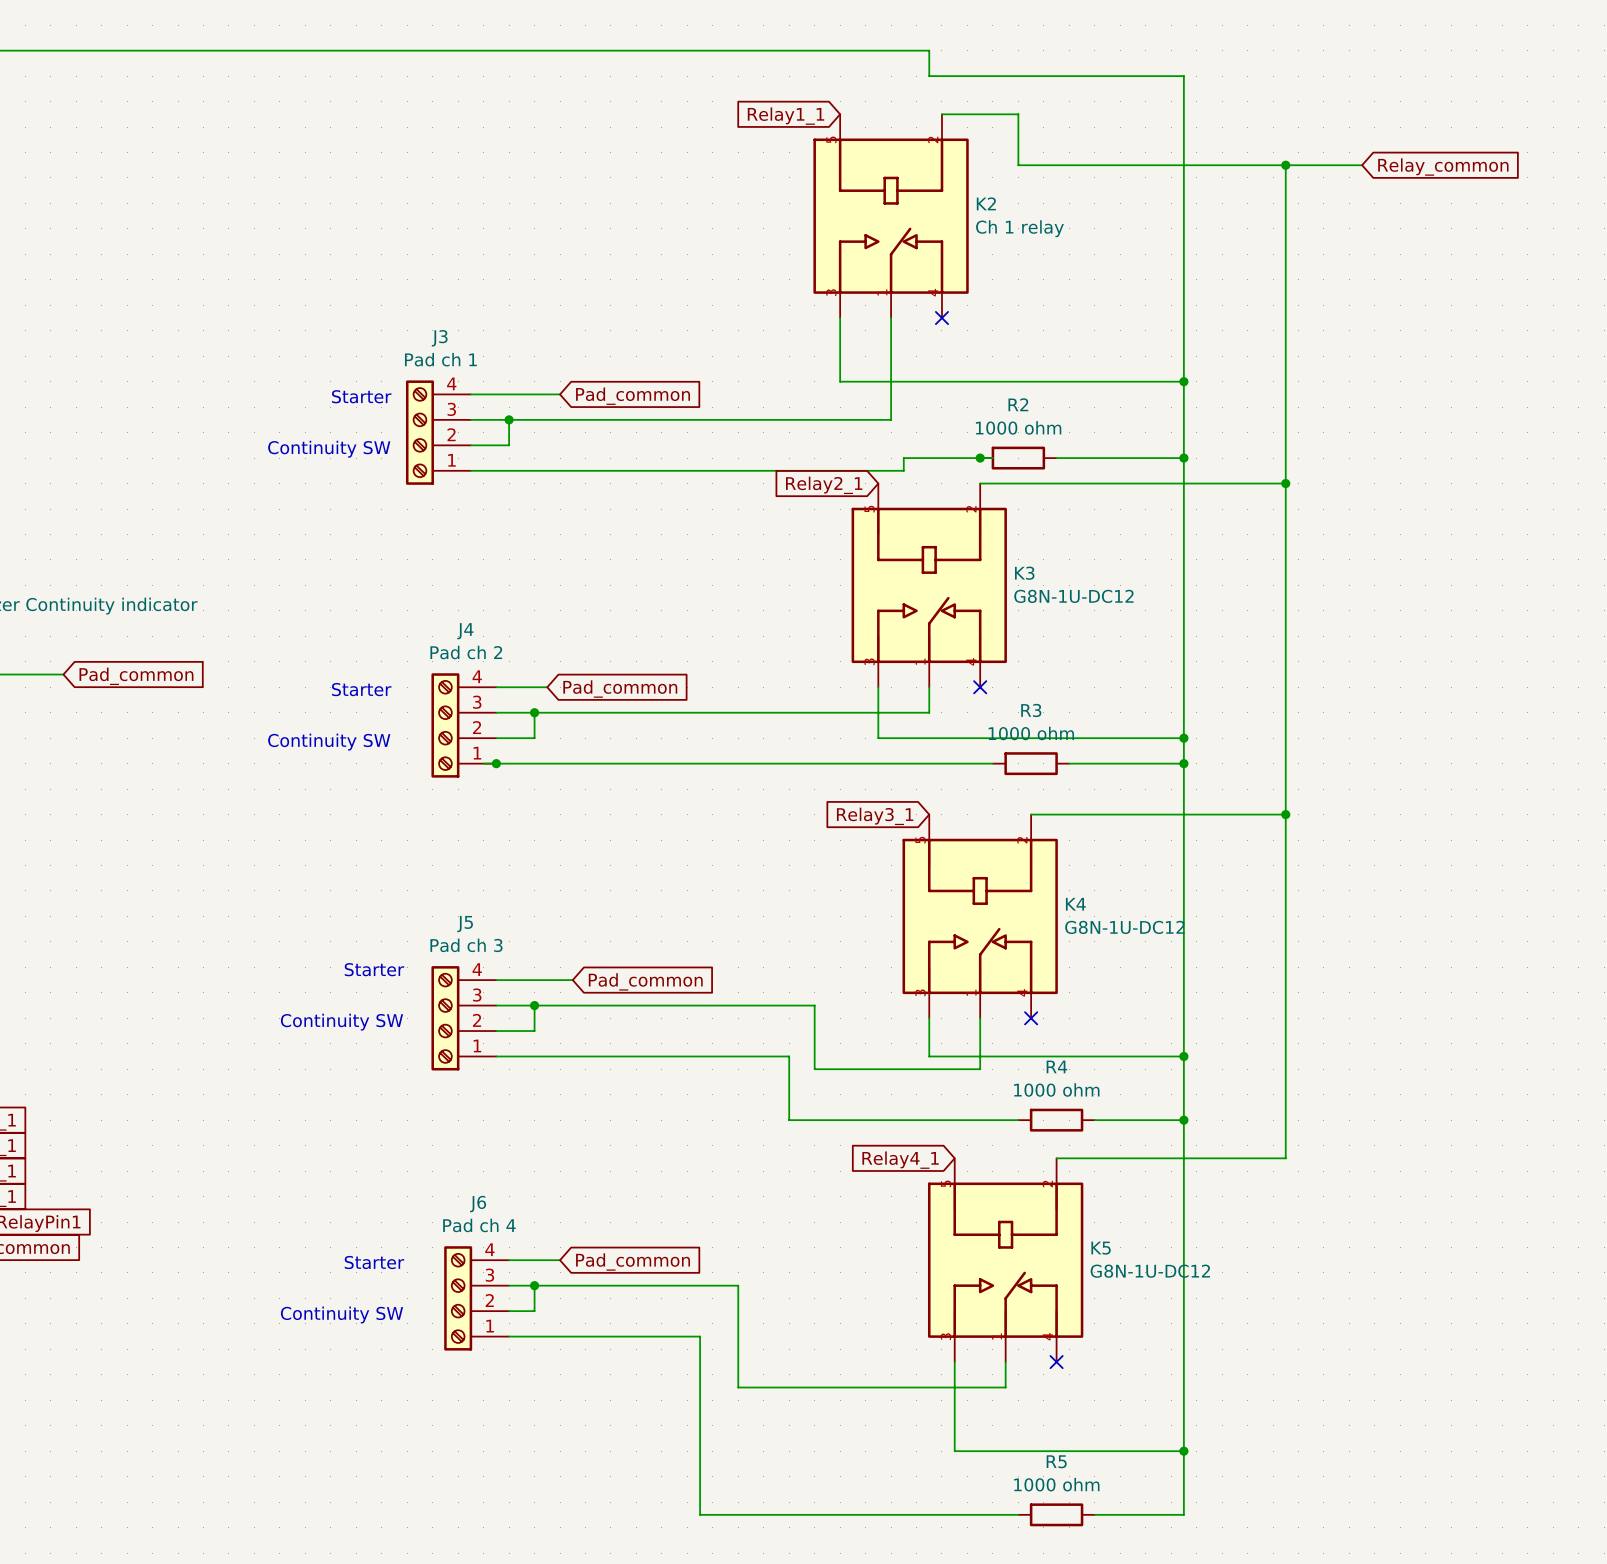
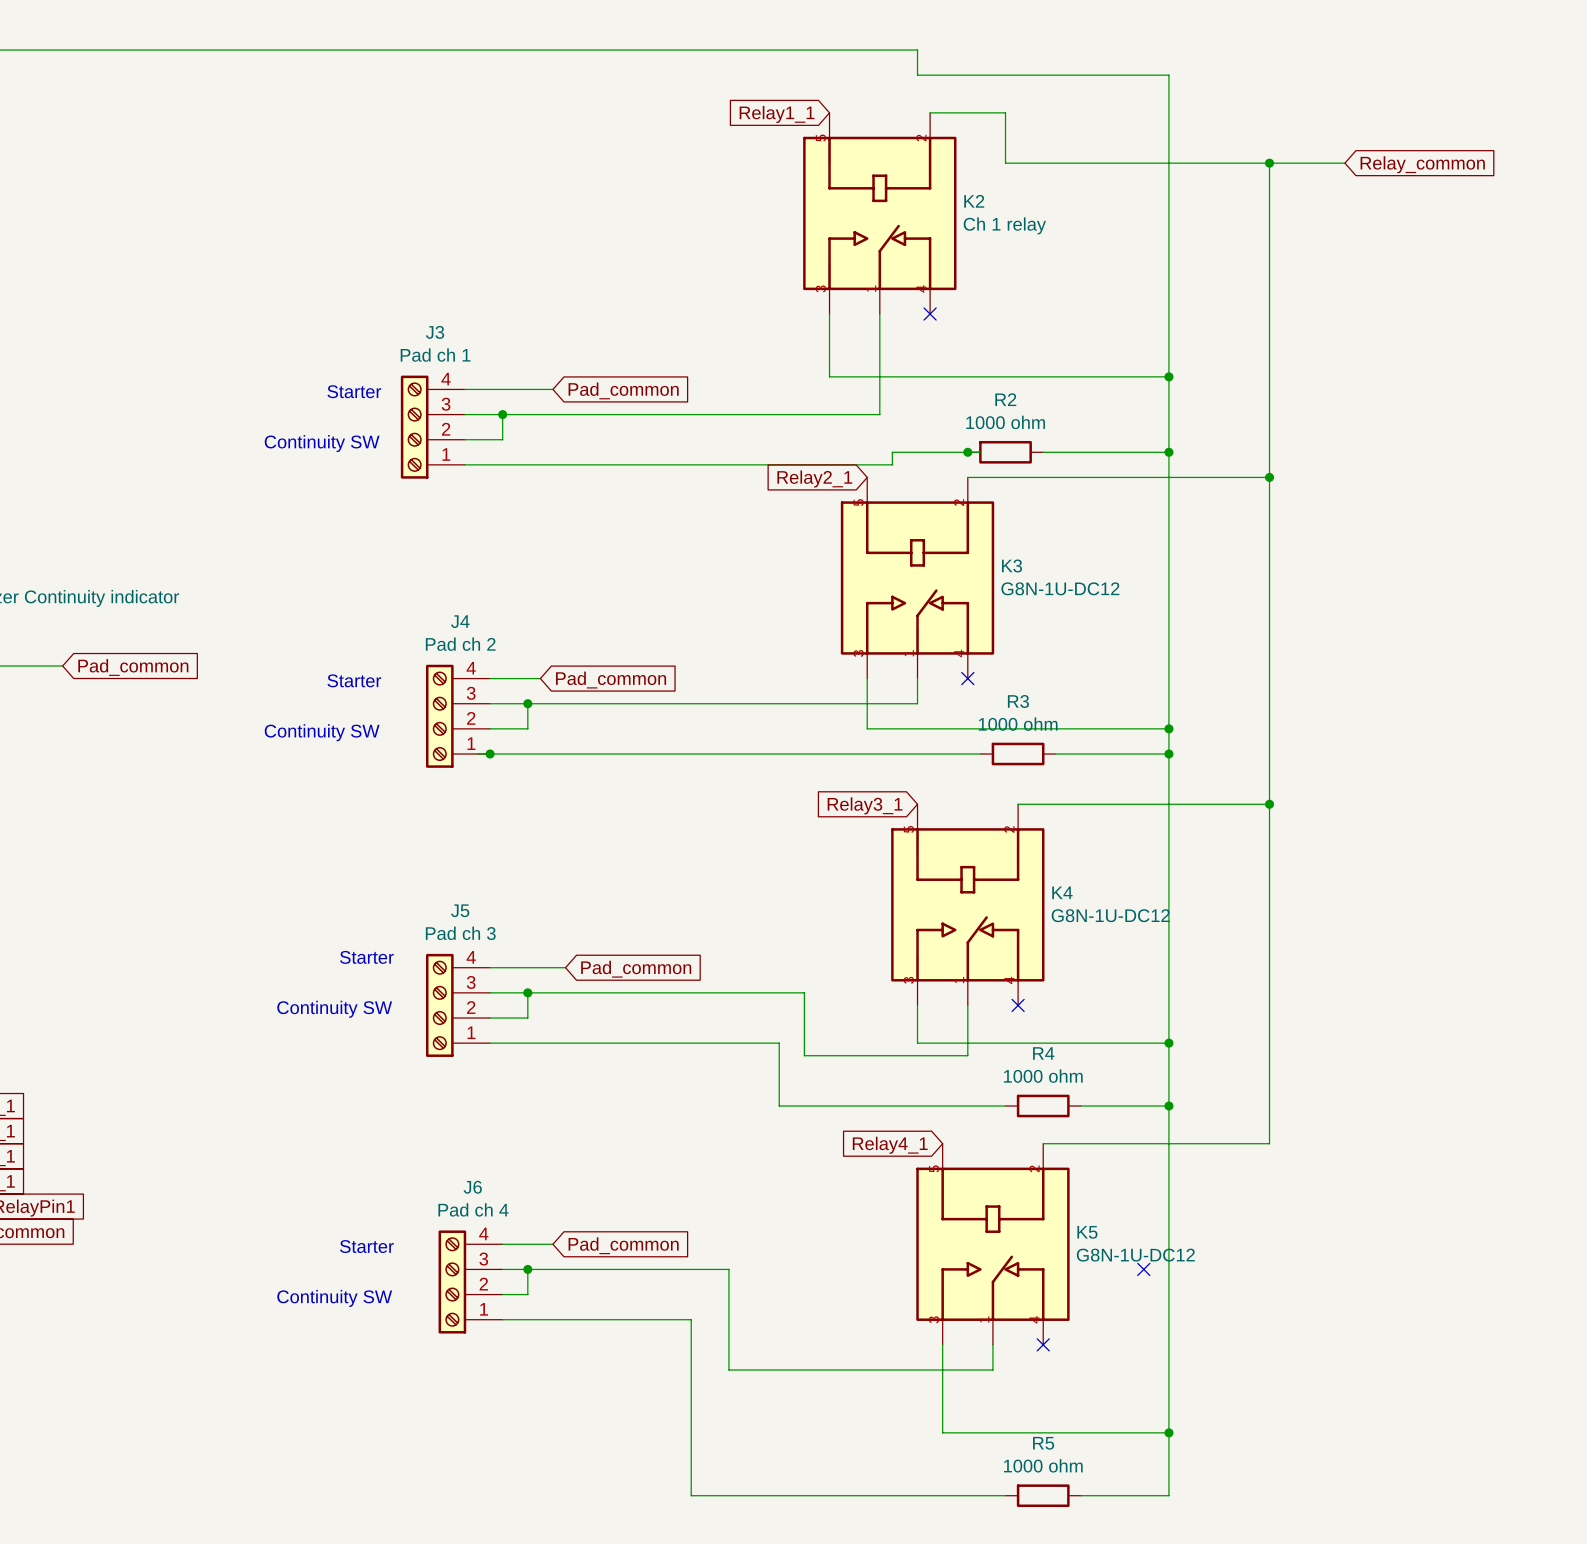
no-connect mark: none -> (1143, 1269)

